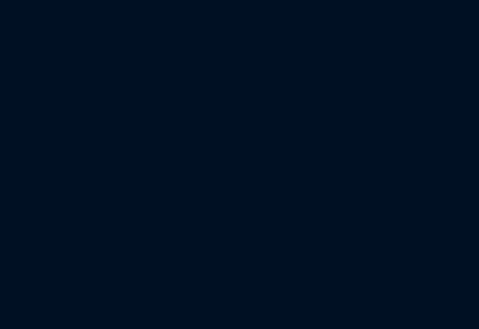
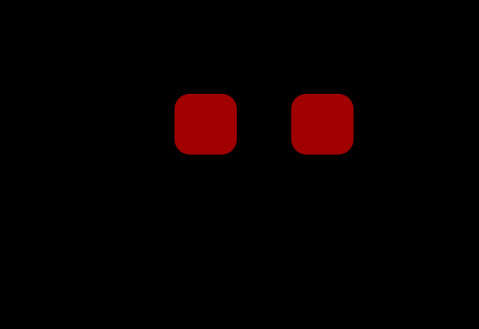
part: none -> (264, 124)

